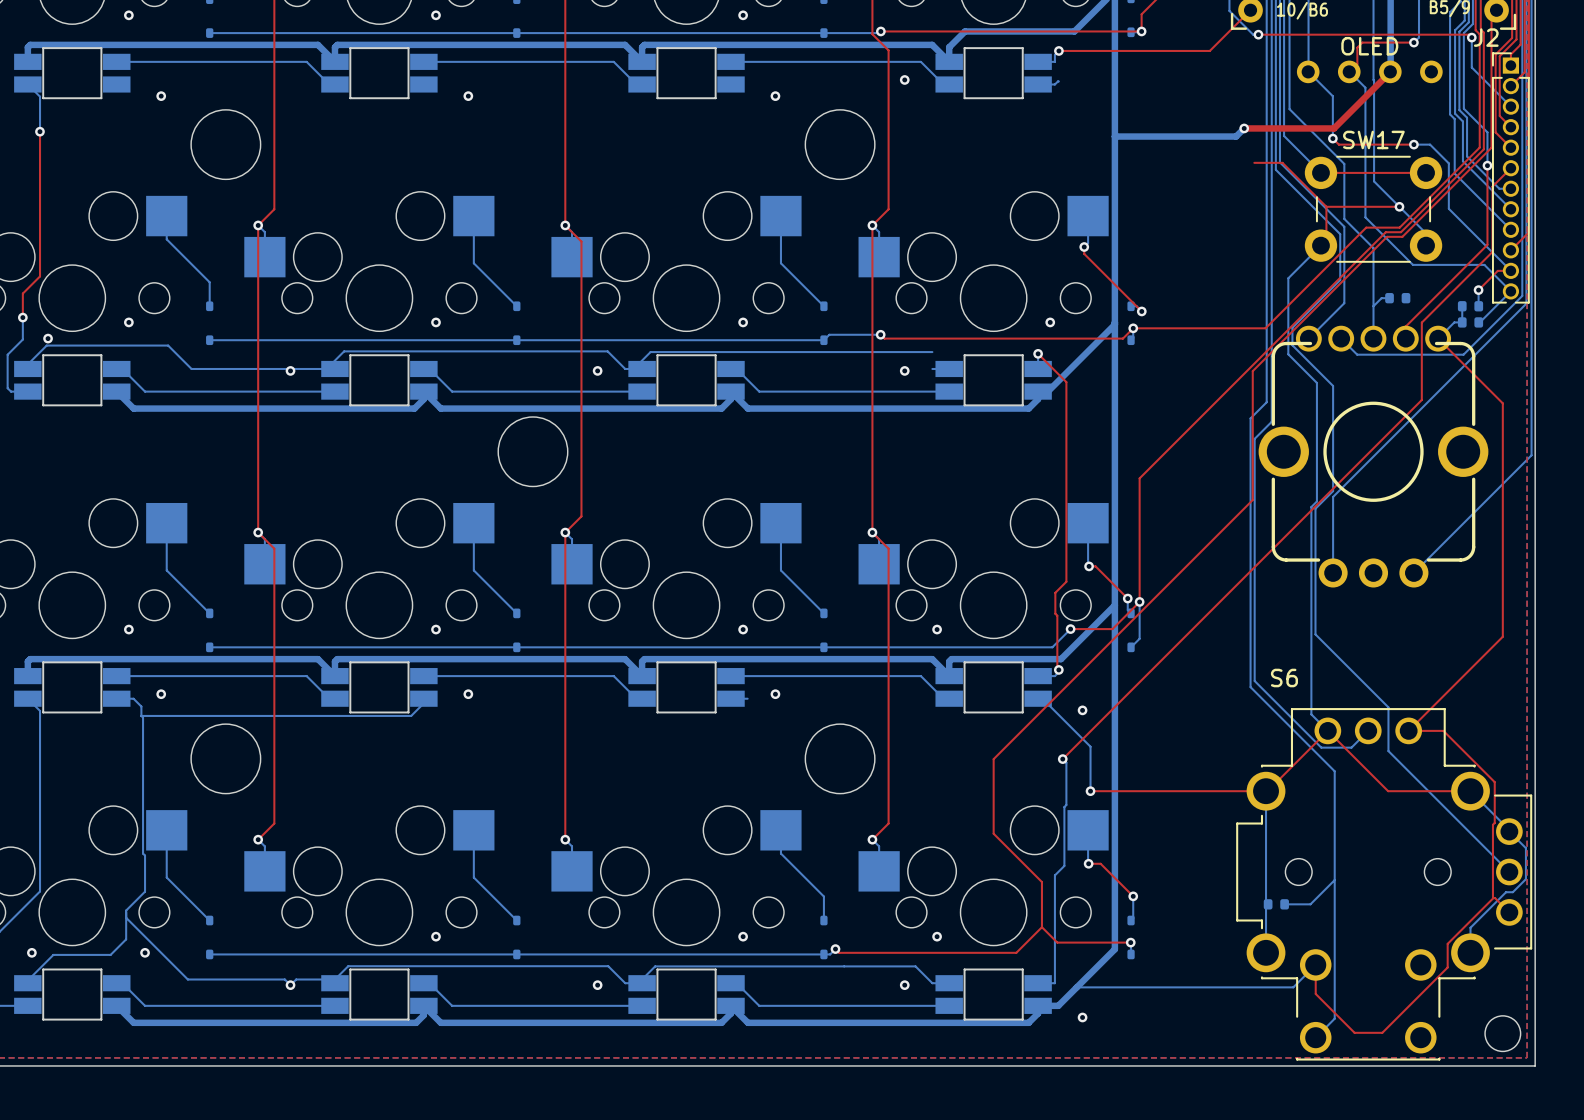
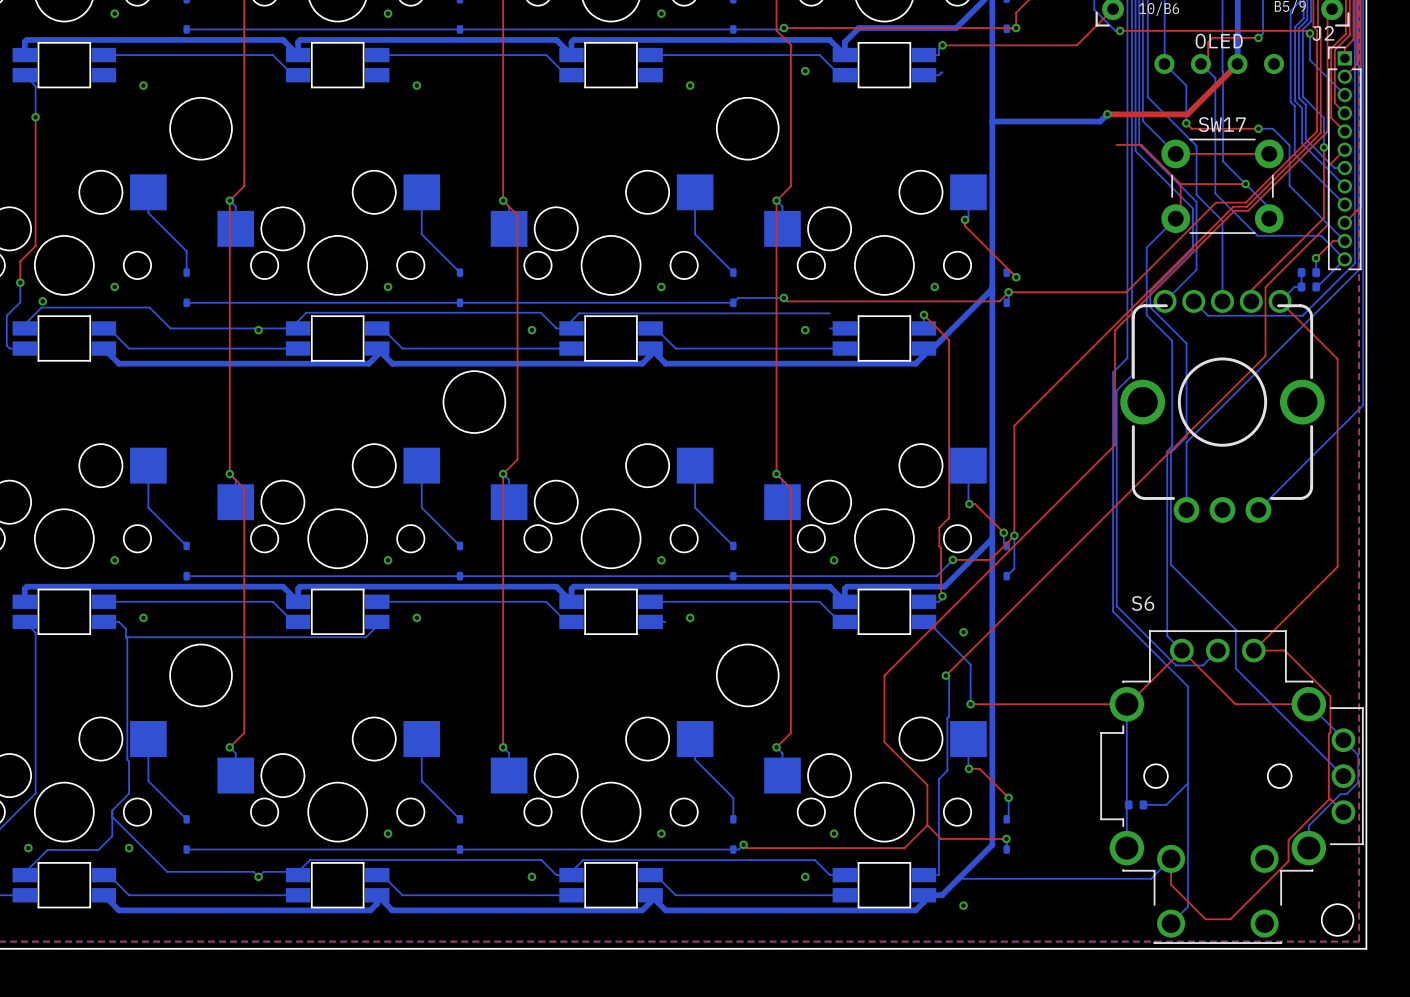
bottom track: (1389, 298) (1381, 298) (1373, 306) -> none
part: (1397, 298) -> none

